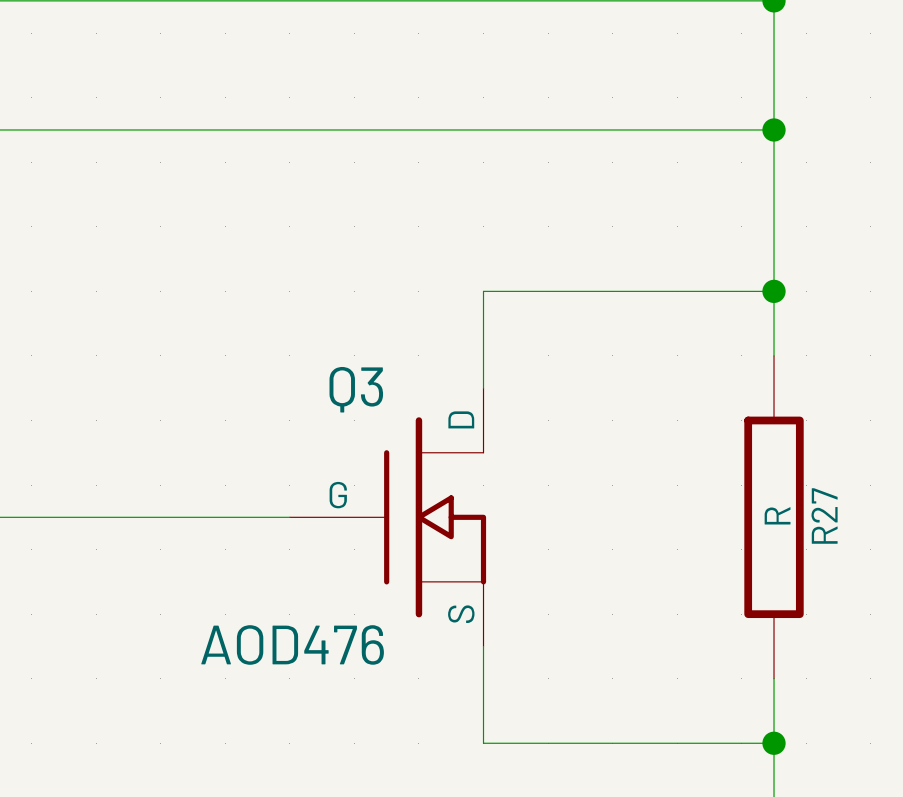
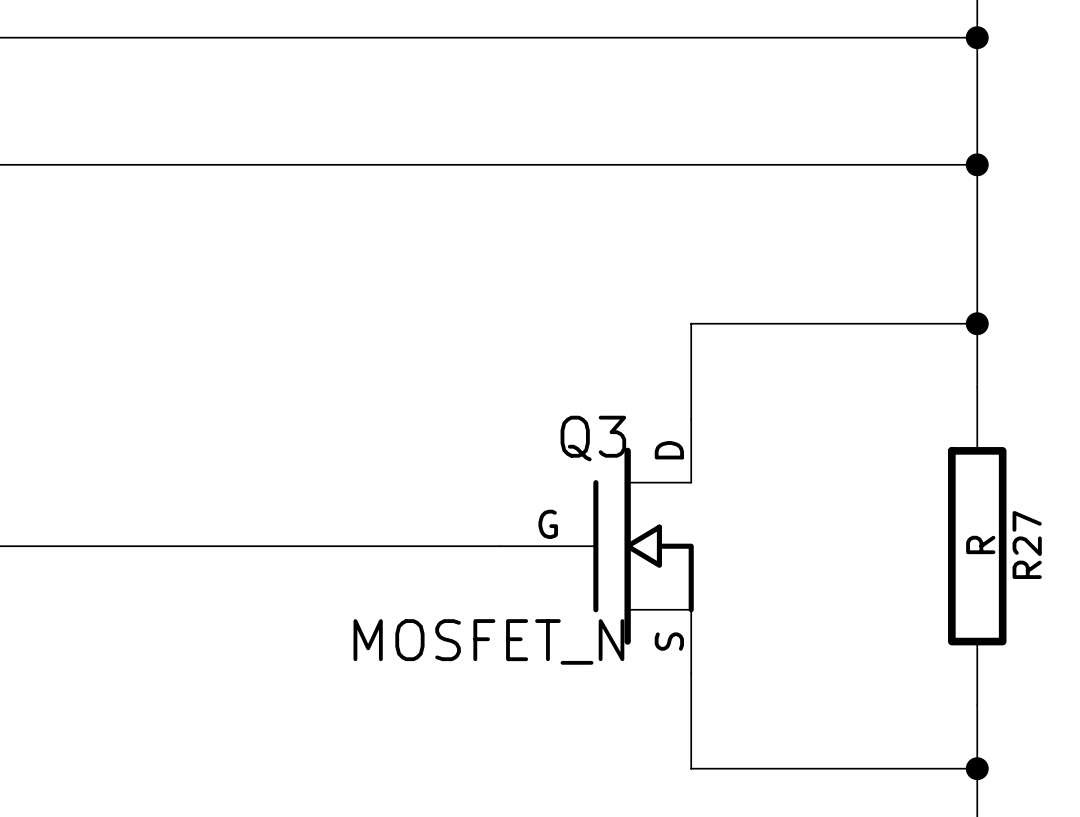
Q3 name position: Q3 (356, 389) -> Q3 (593, 438)
Q3 value: AOD476 (292, 644) -> MOSFET_N (488, 641)

